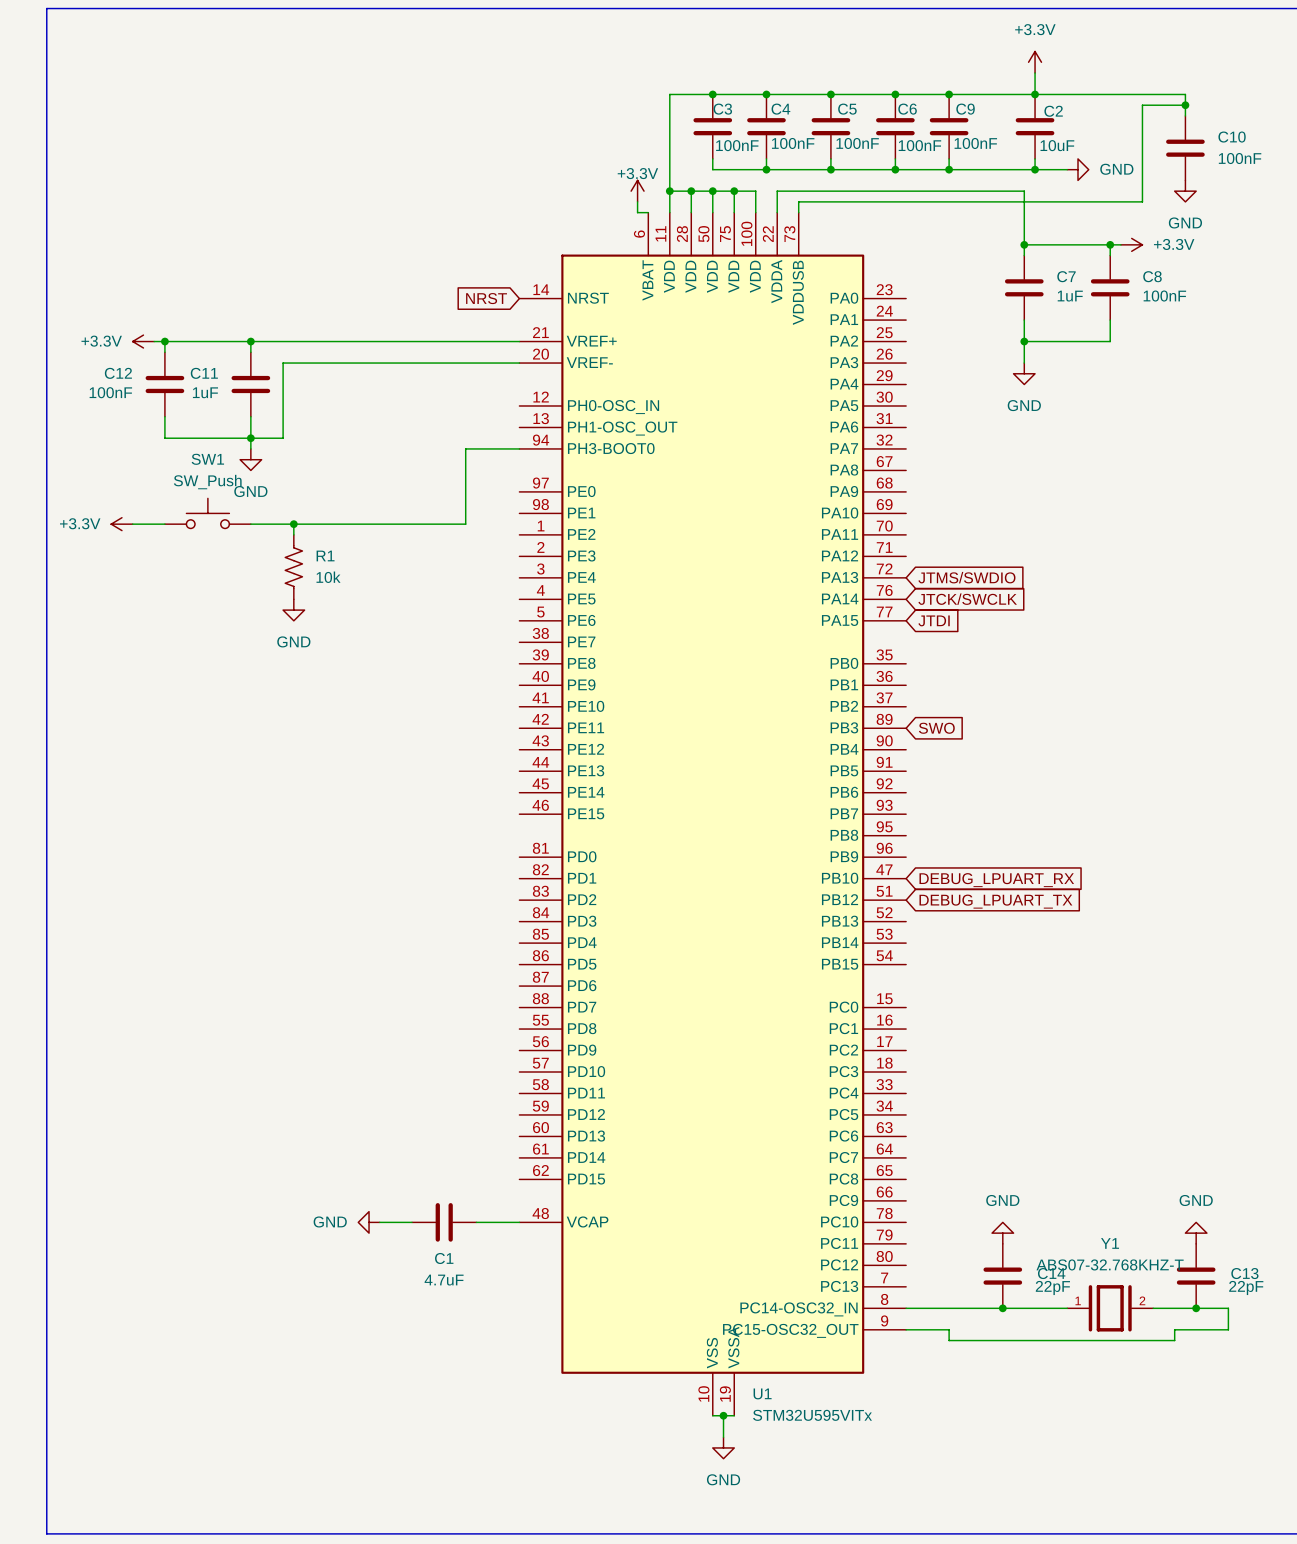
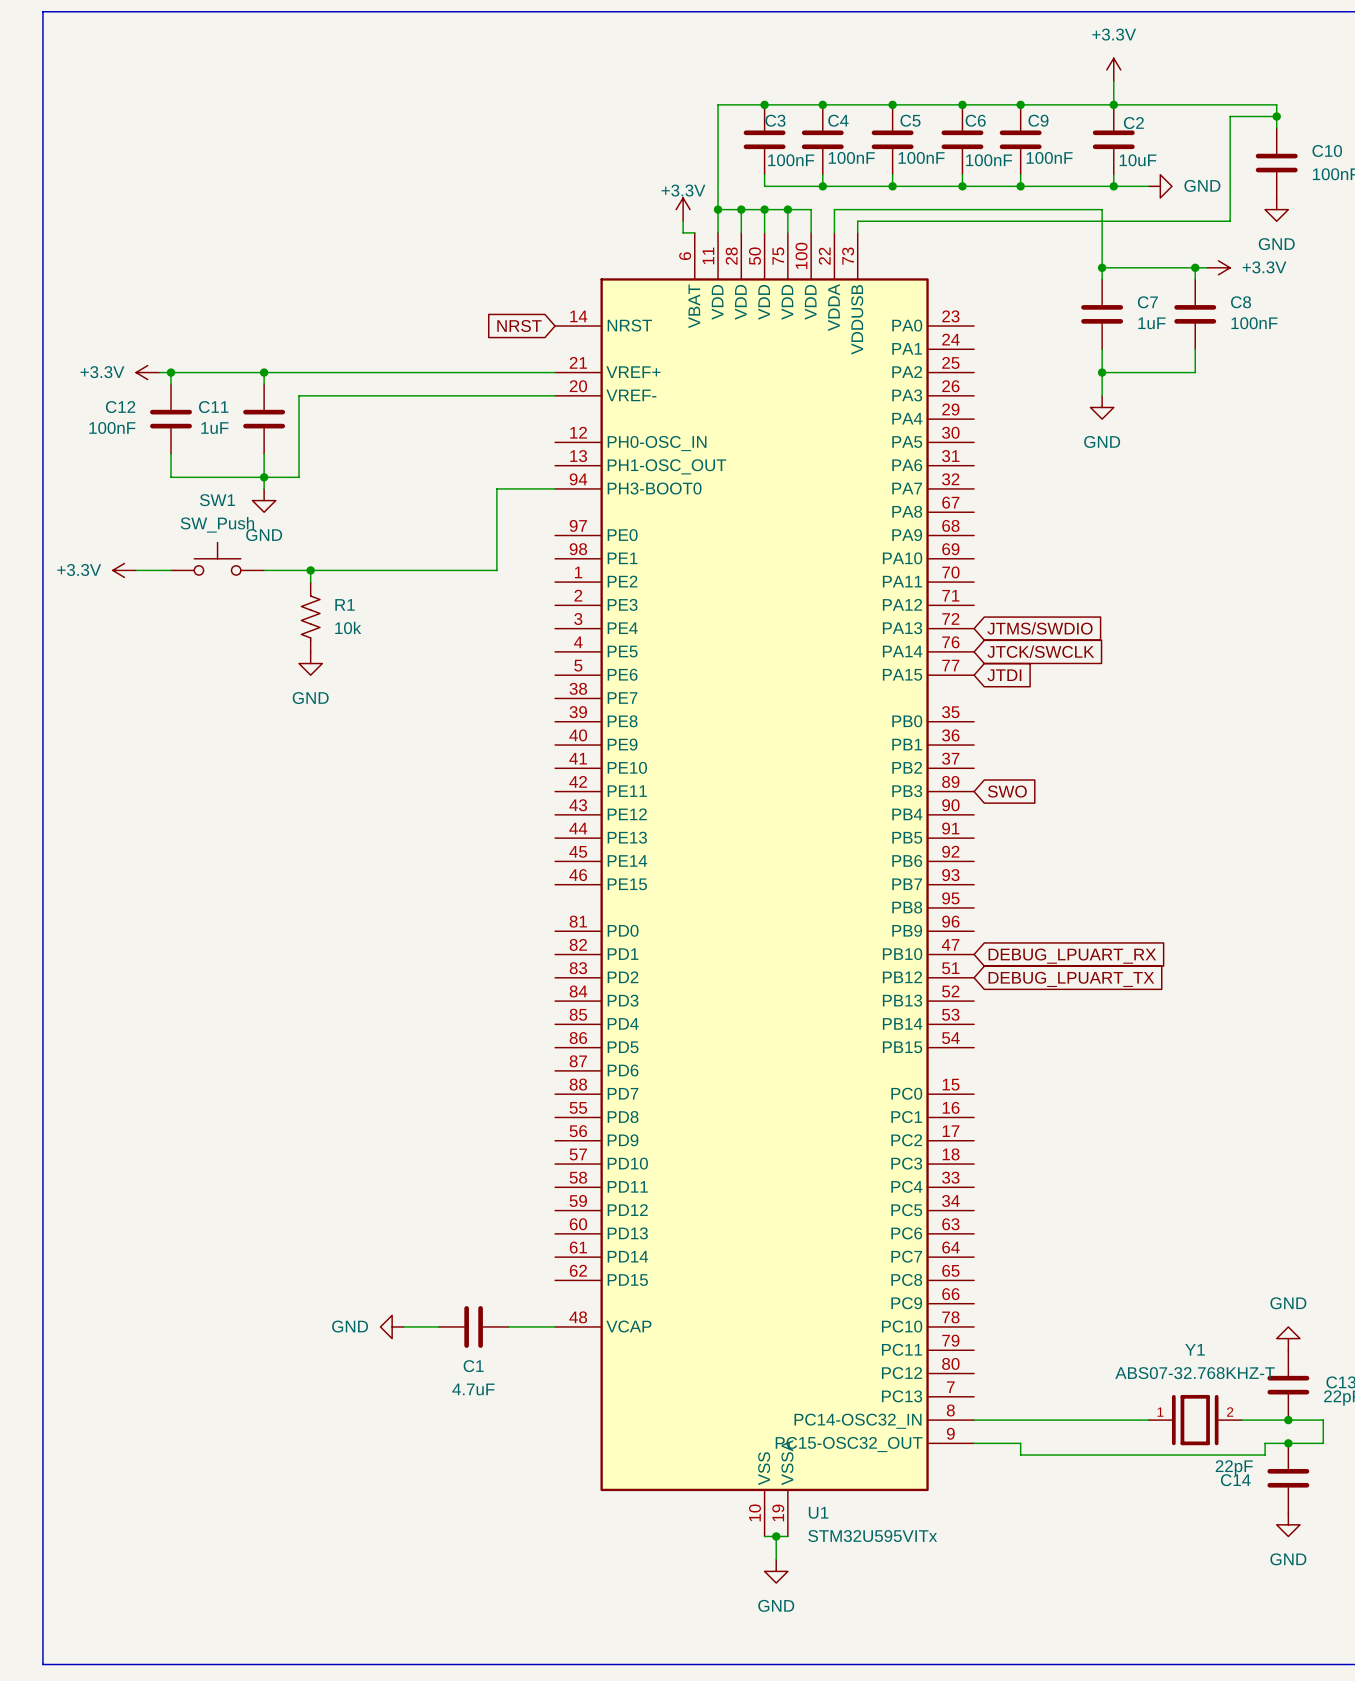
power symbol: GND (1002, 1233) -> none
C14 name position: C14 (1051, 1273) -> C14 (1235, 1480)
C14 position: (1002, 1276) -> (1288, 1478)
C14 value position: 22pF (1052, 1287) -> 22pF (1234, 1467)
junction: (1002, 1308) -> none
junction: none -> (1288, 1443)
power symbol: none -> GND (1288, 1524)

